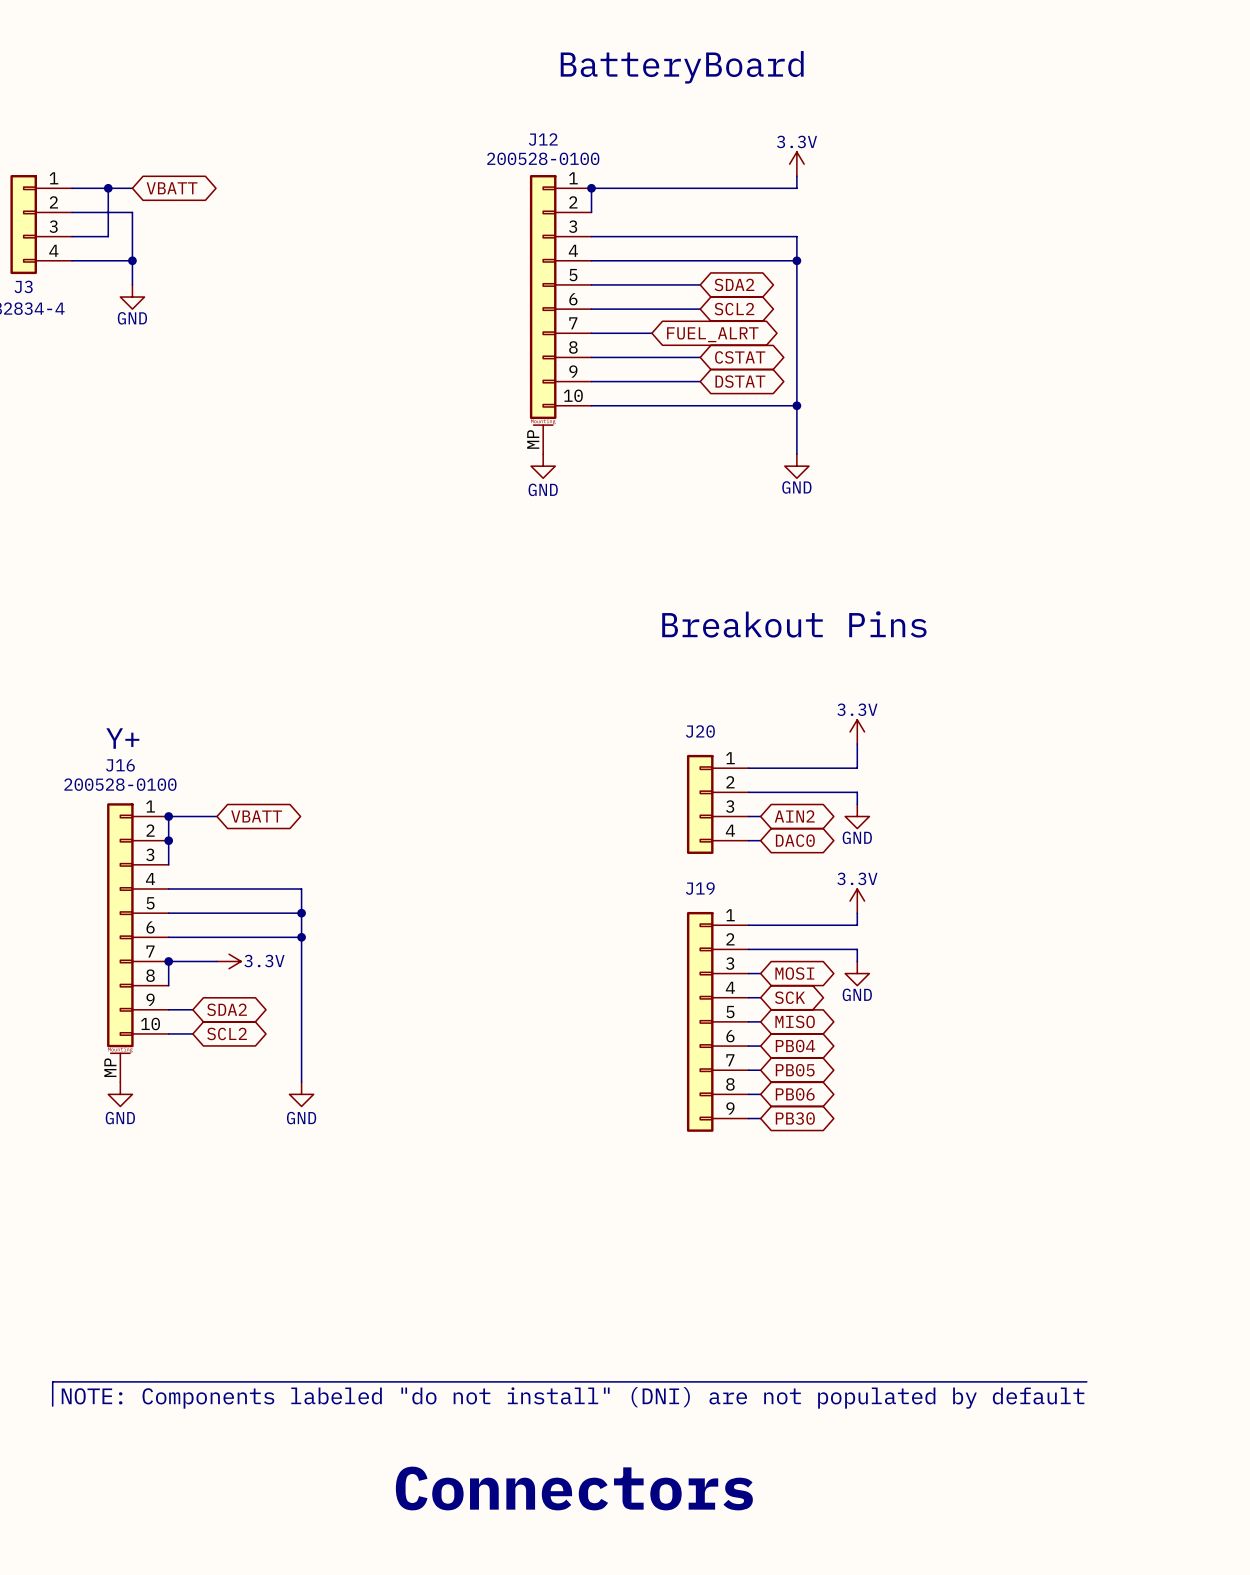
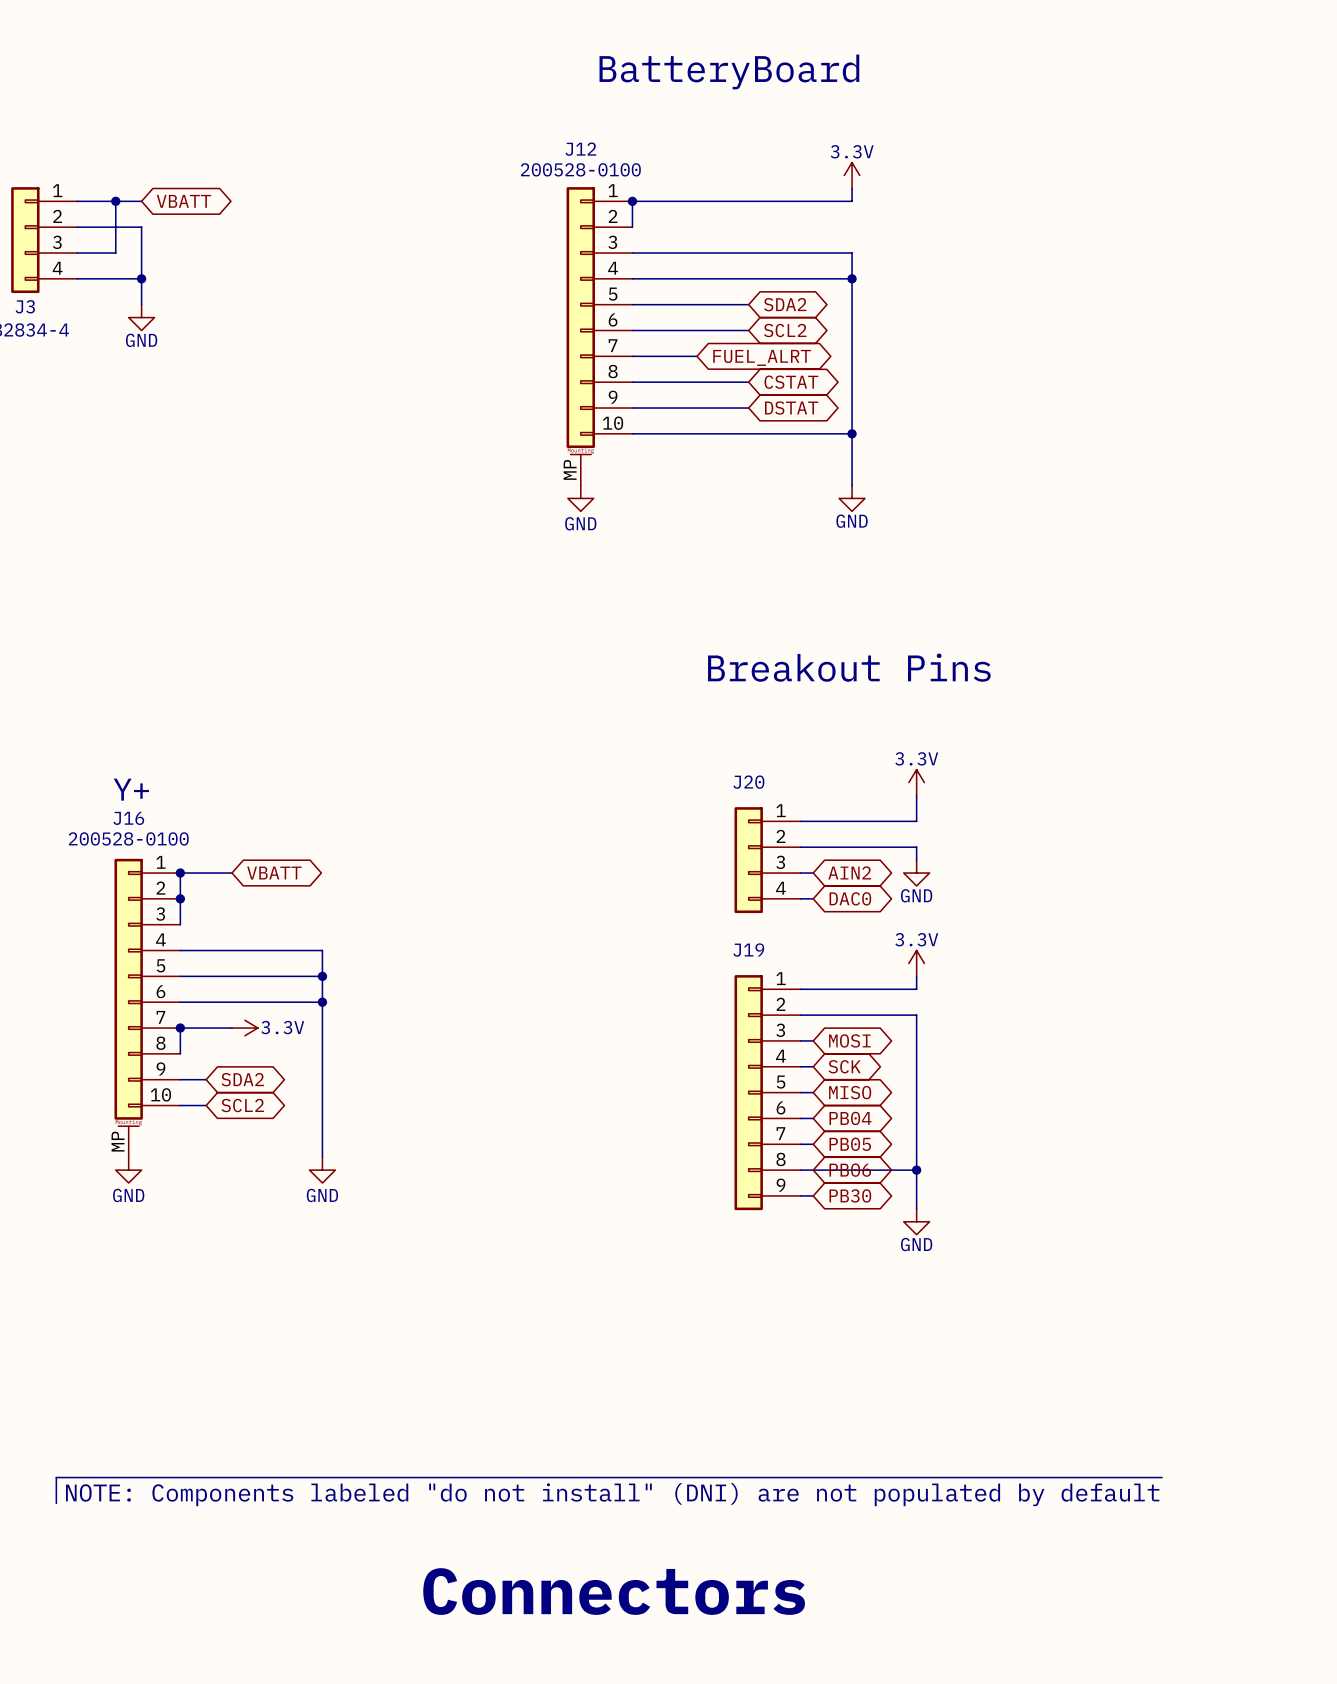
wire: none -> (916, 1028) (916, 1208)
power symbol position: GND (857, 973) -> GND (916, 1221)
wire: none -> (813, 1170) (916, 1170)
junction: none -> (916, 1170)

